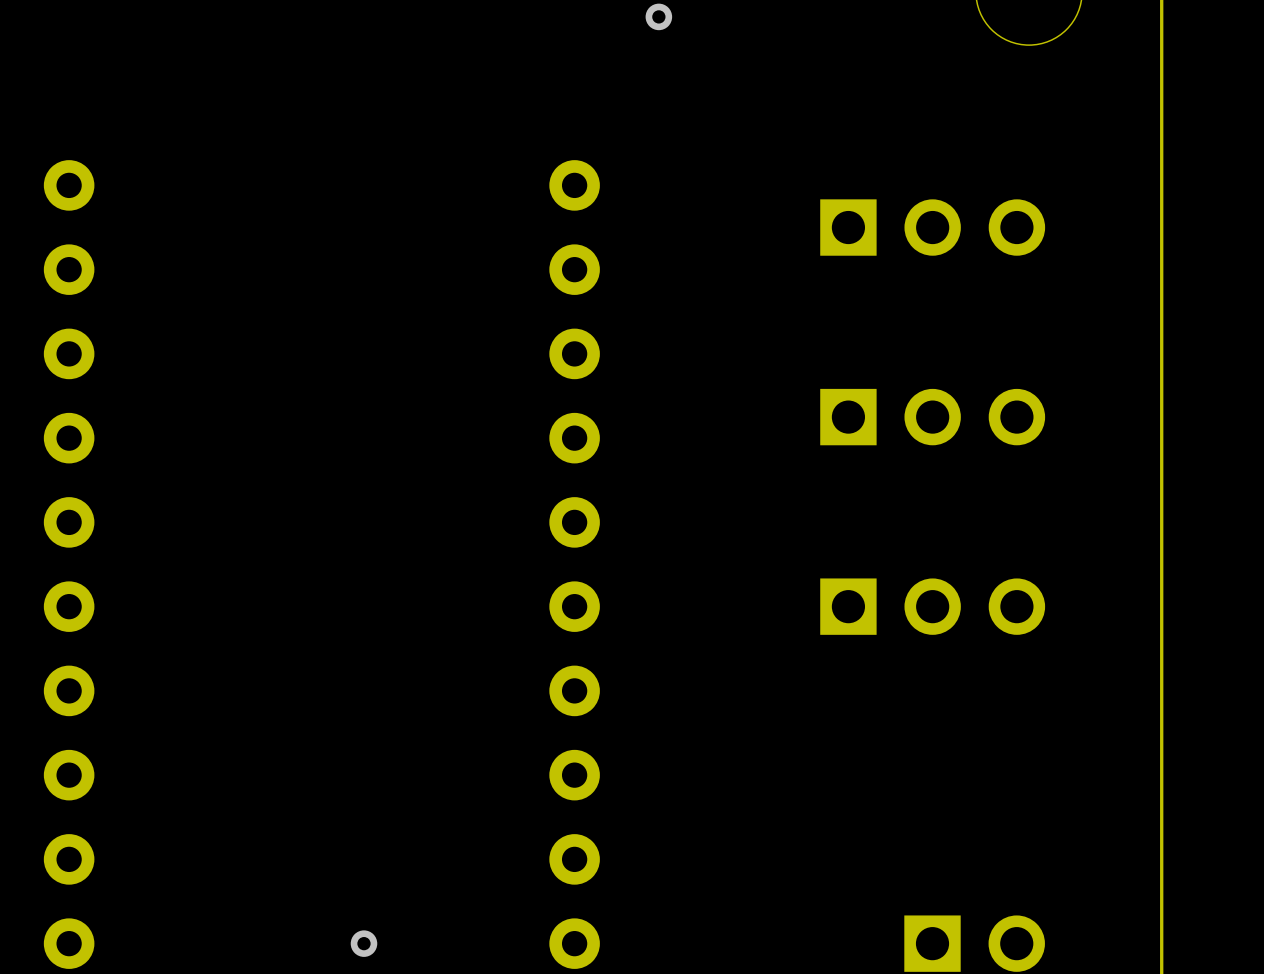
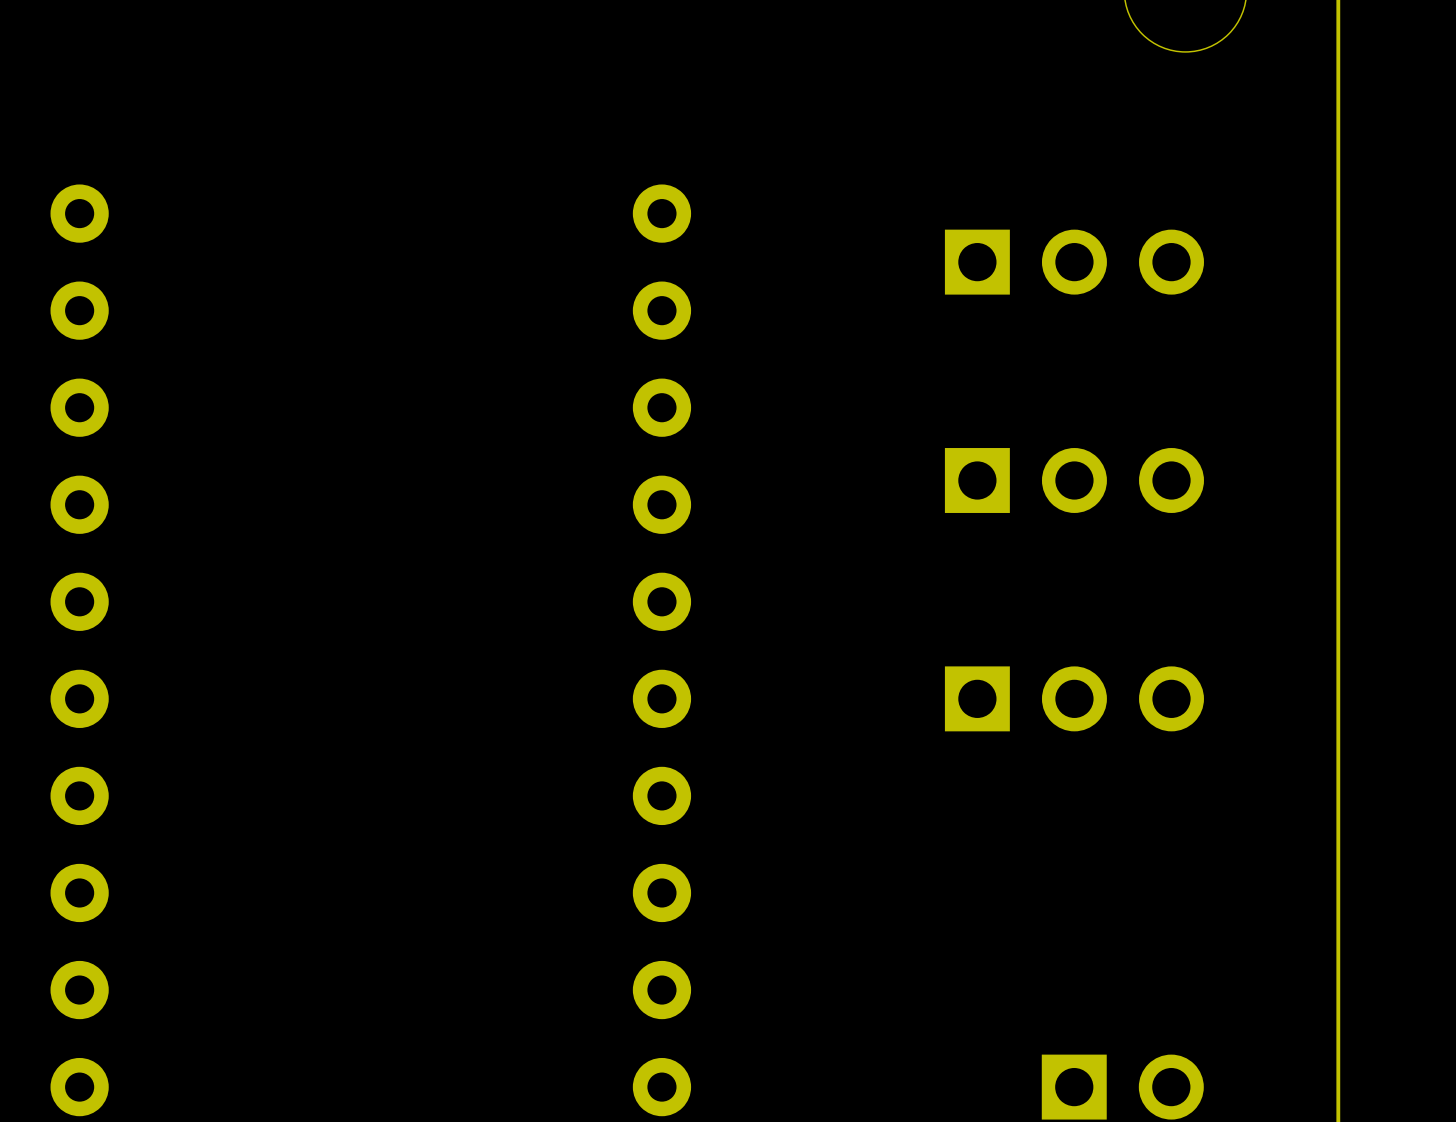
via: (658, 16) -> none
via: (363, 943) -> none

